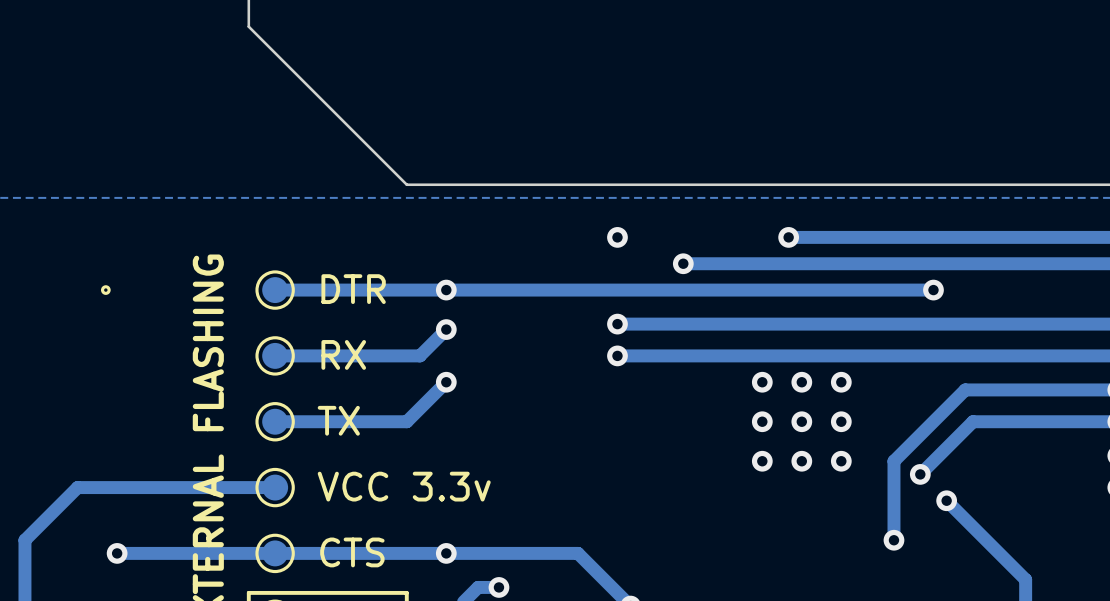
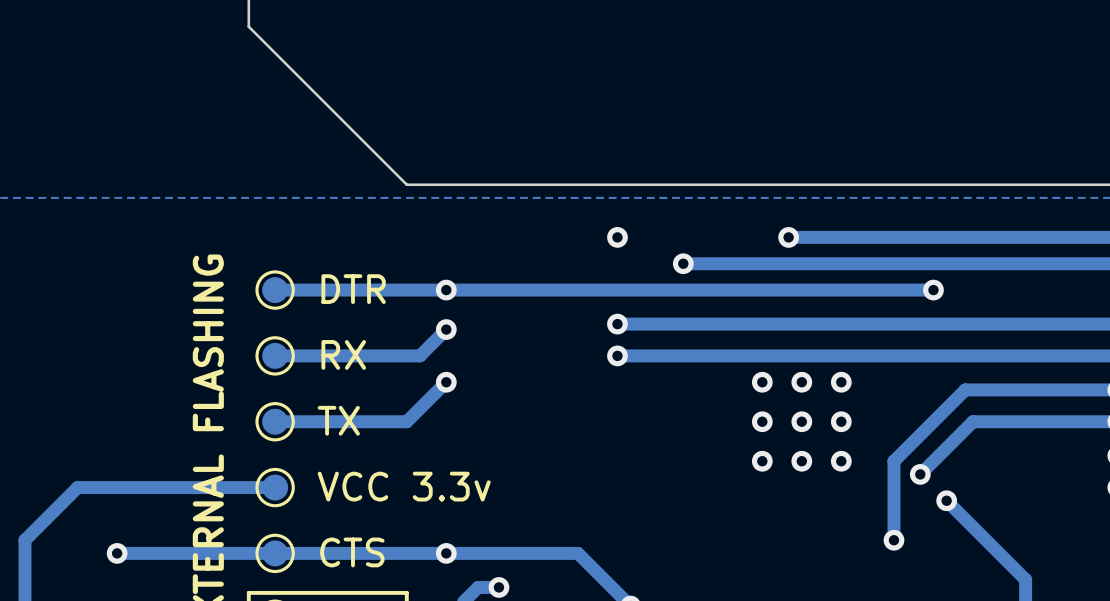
part: (105, 290) -> none

